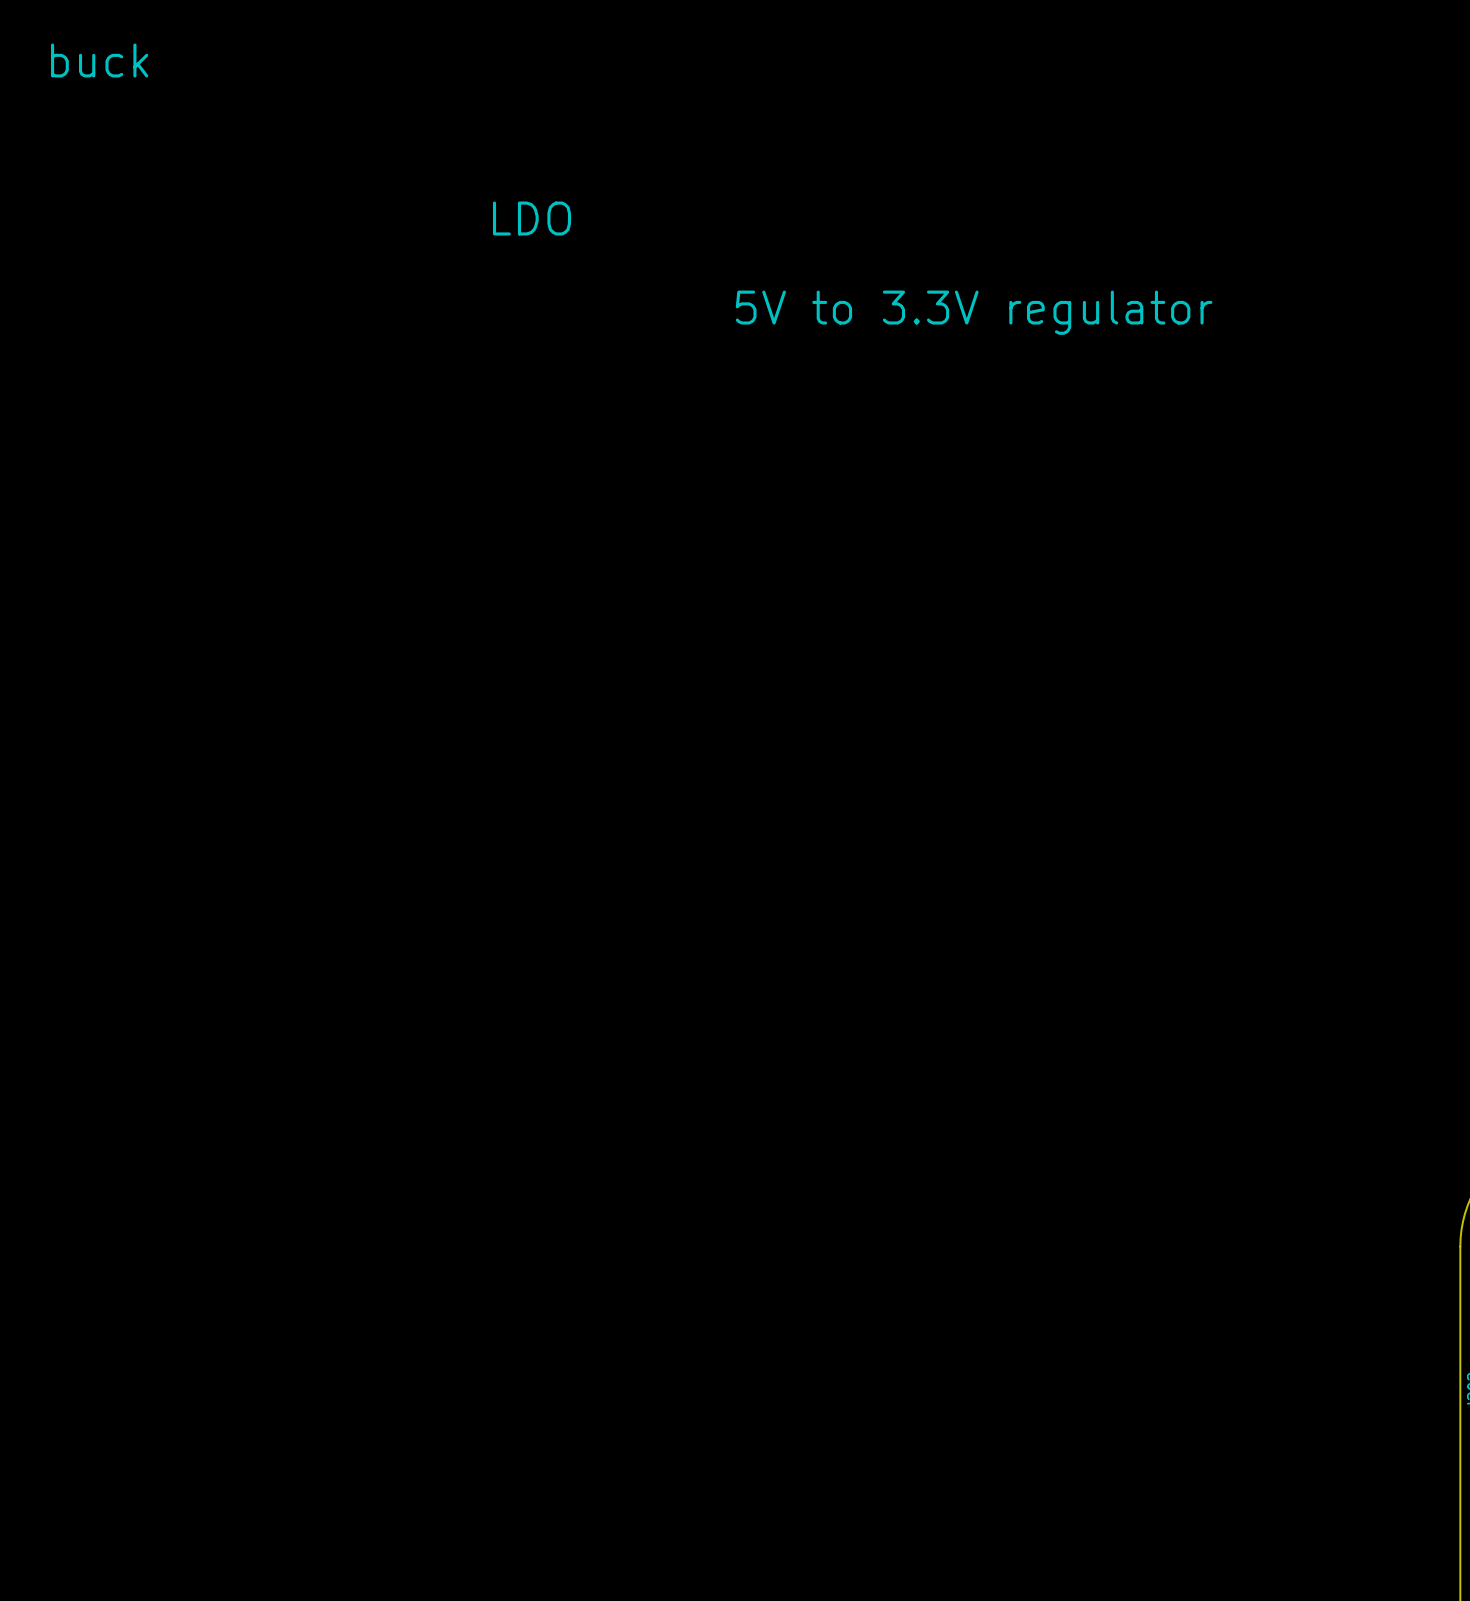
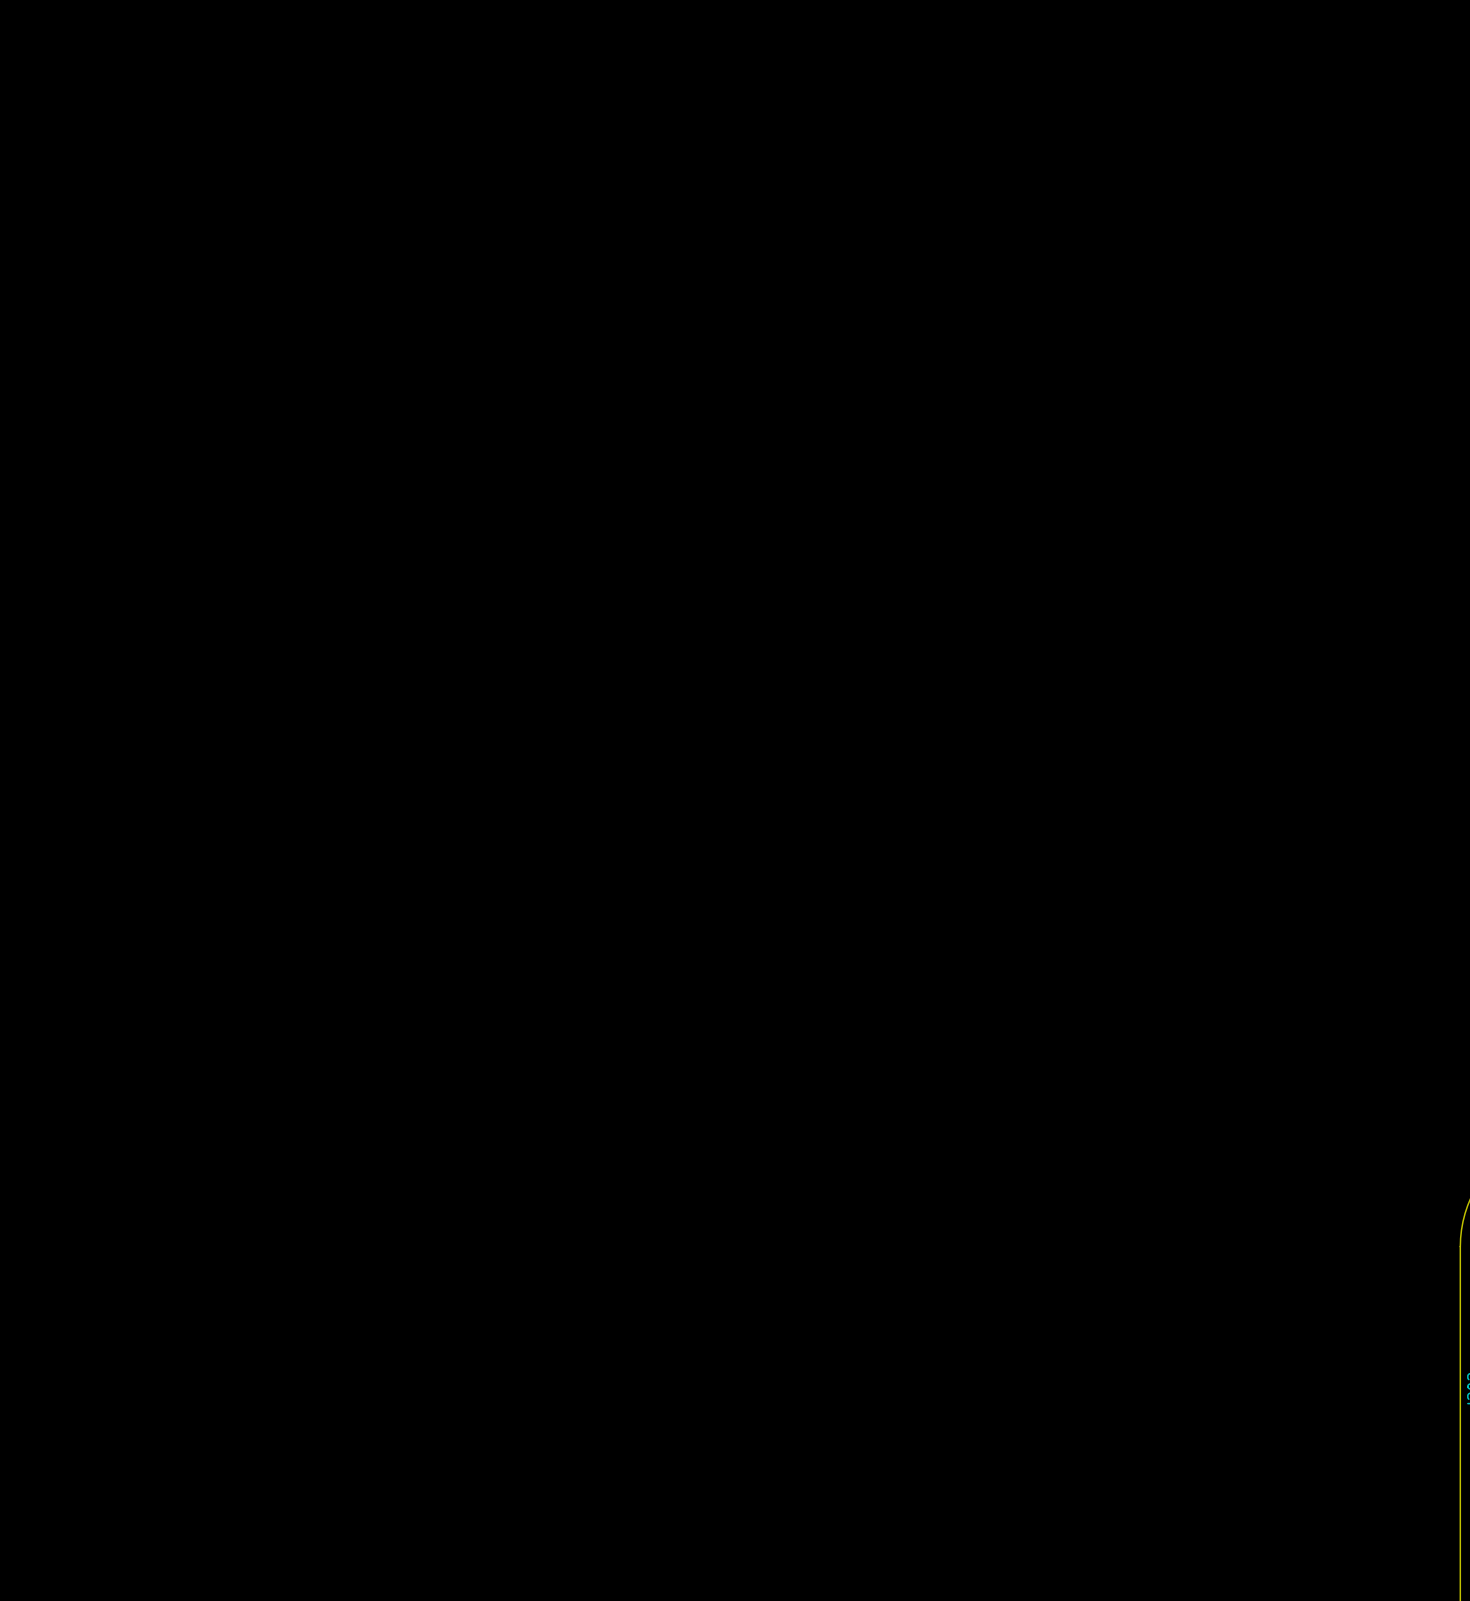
text: buck (99, 60) -> none
text: LDO (531, 218) -> none
text: 5V to 3.3V regulator (974, 312) -> none

